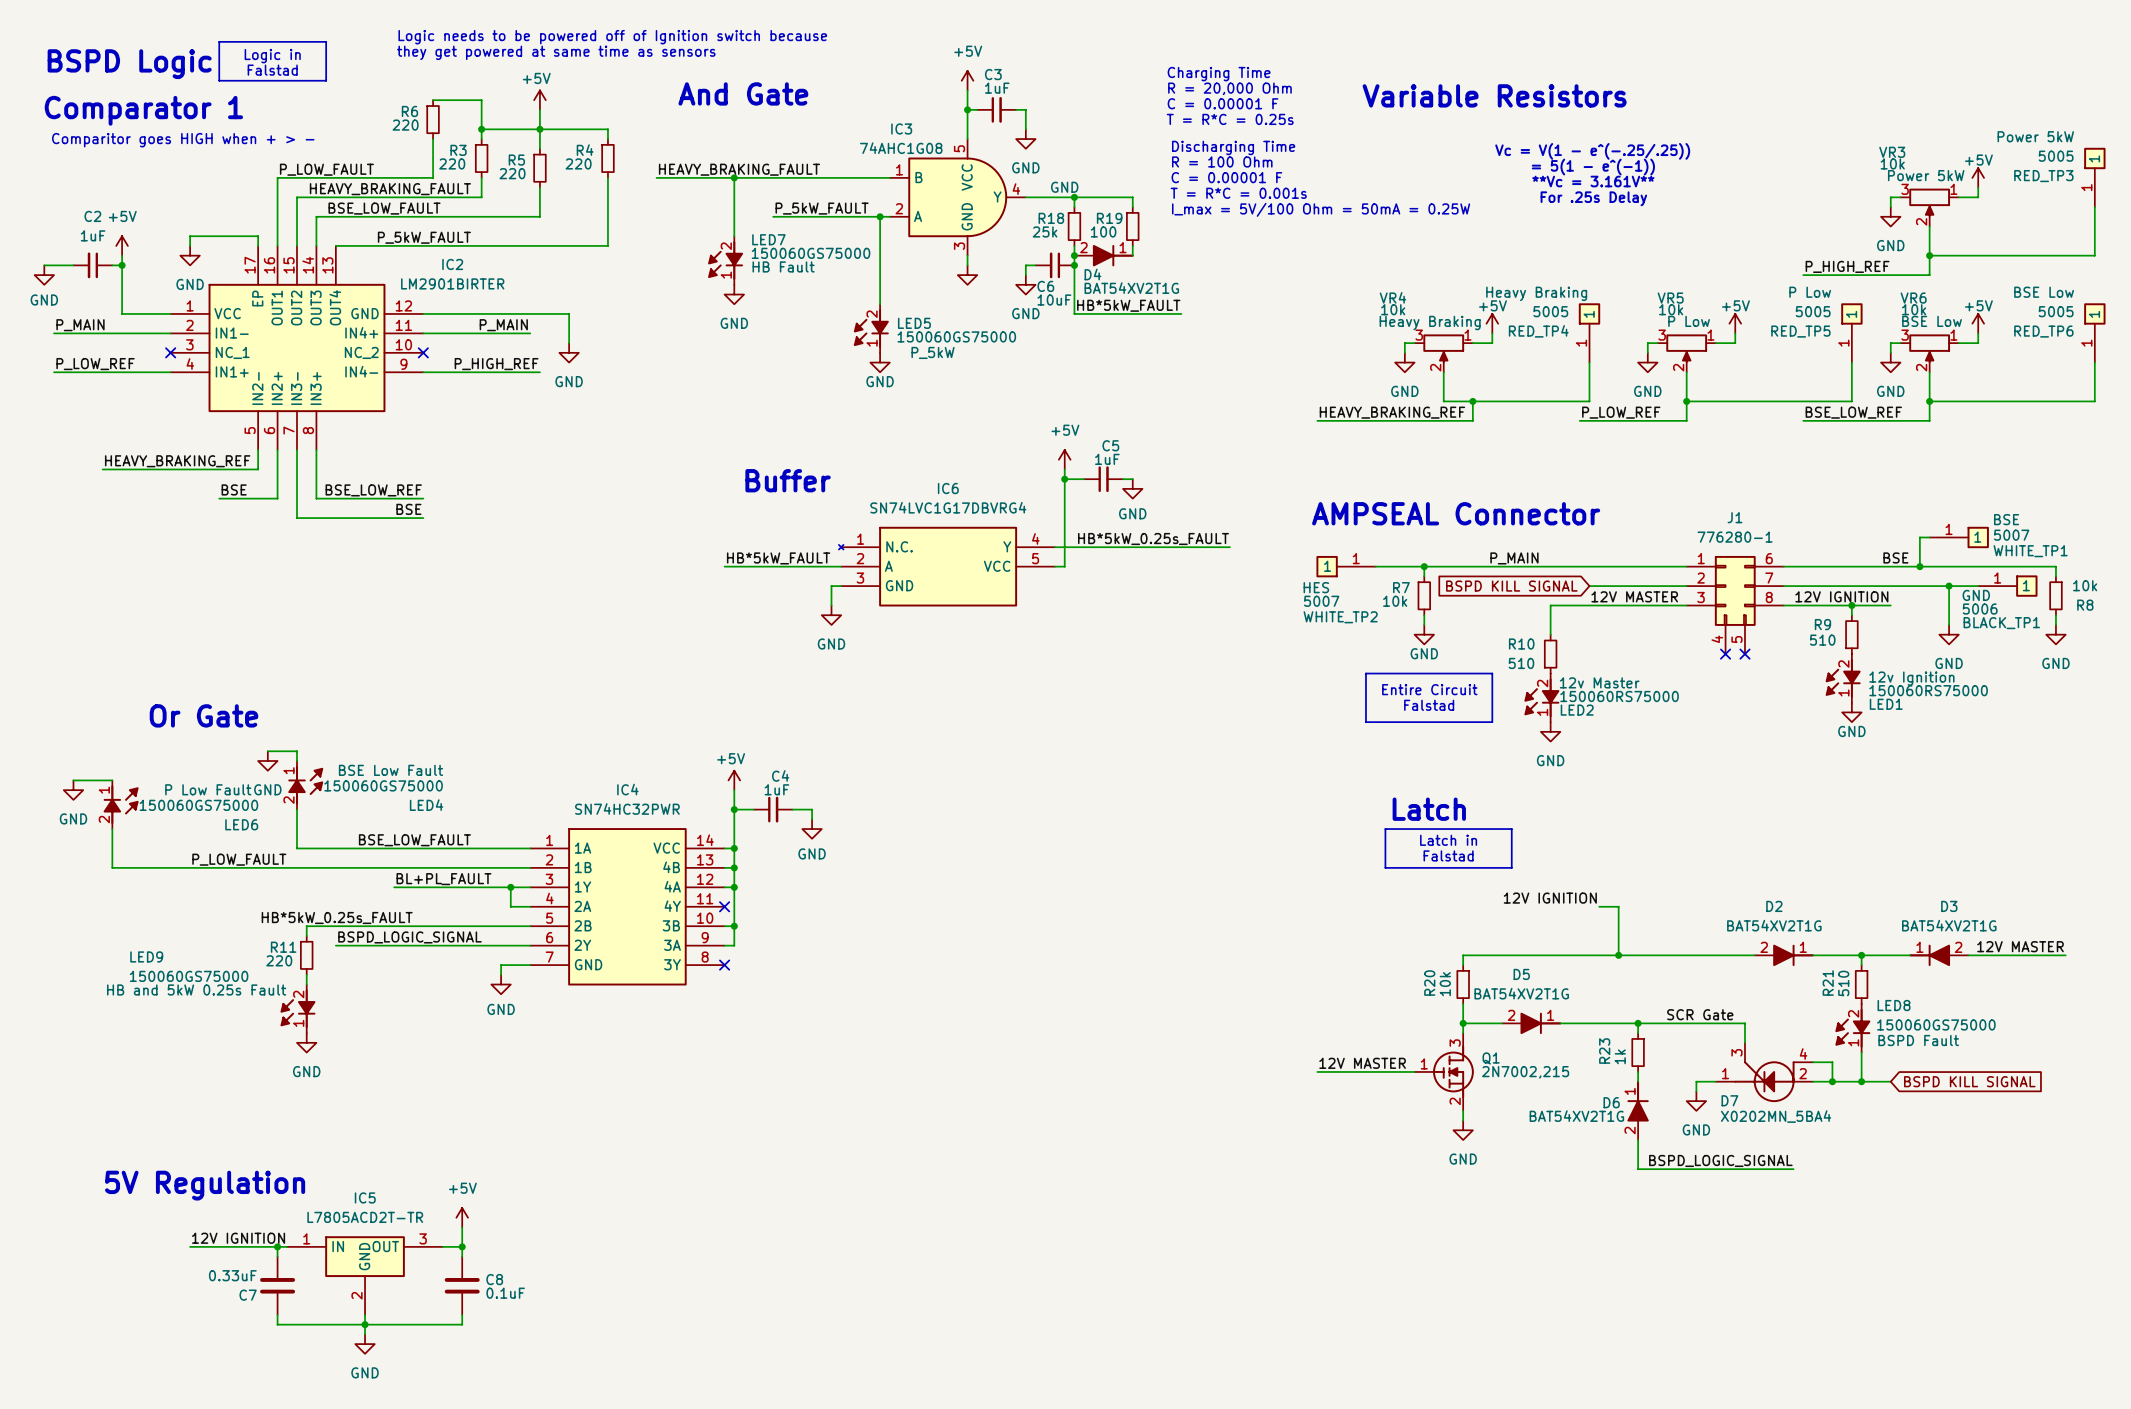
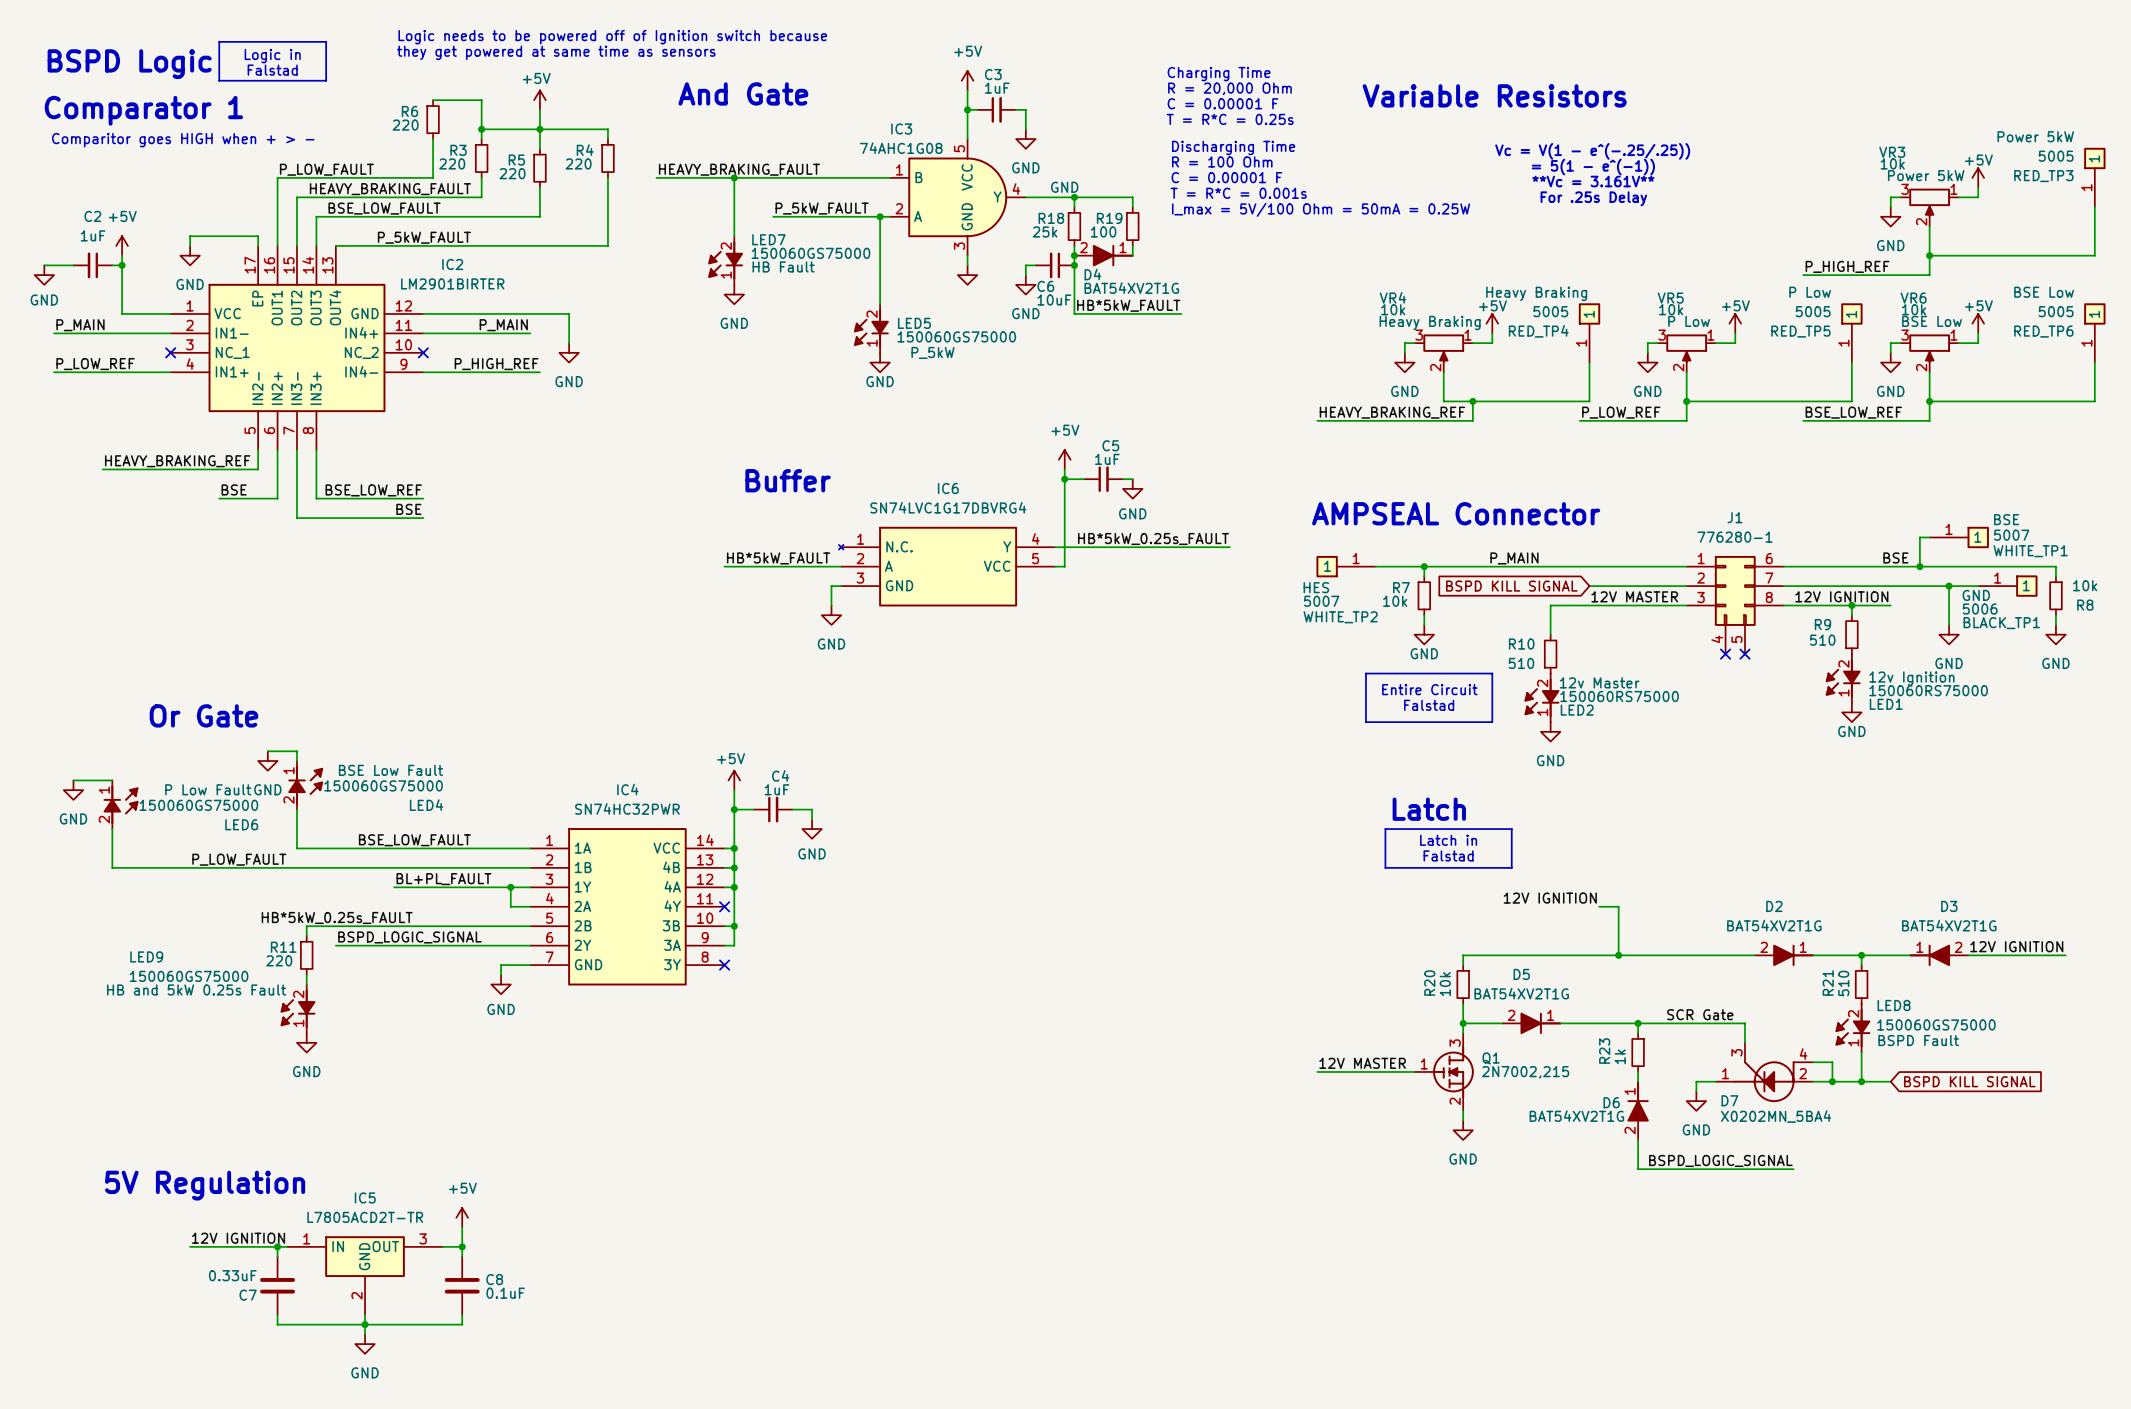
label: 12V MASTER (2020, 946) -> 12V IGNITION (2016, 946)

